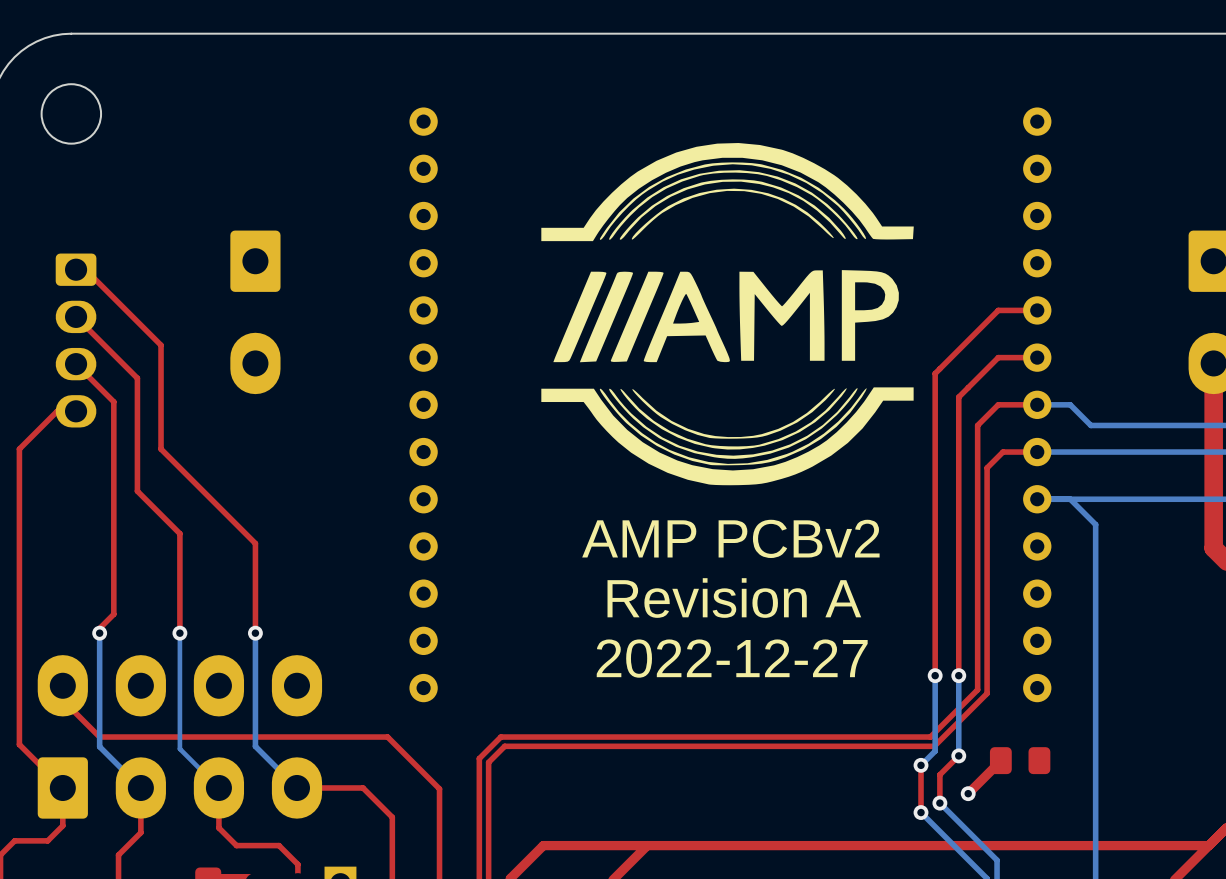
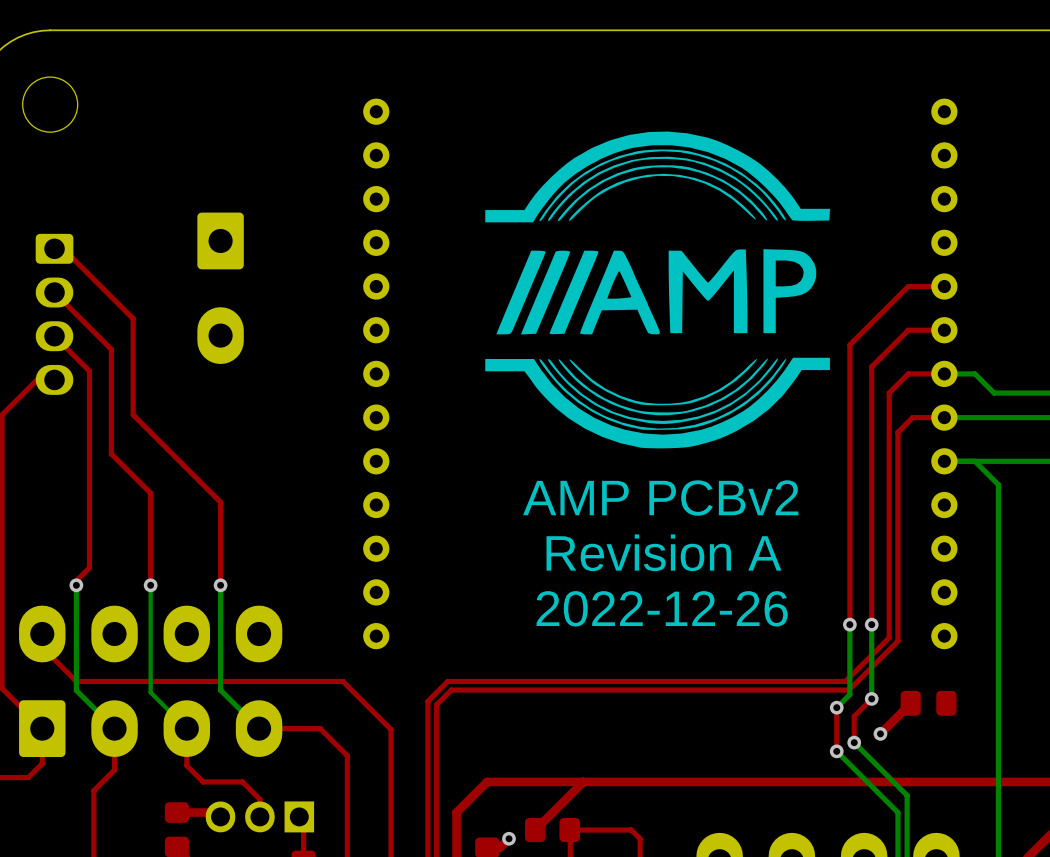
text: 2022-12-27 (732, 658) -> 2022-12-26 (662, 608)

